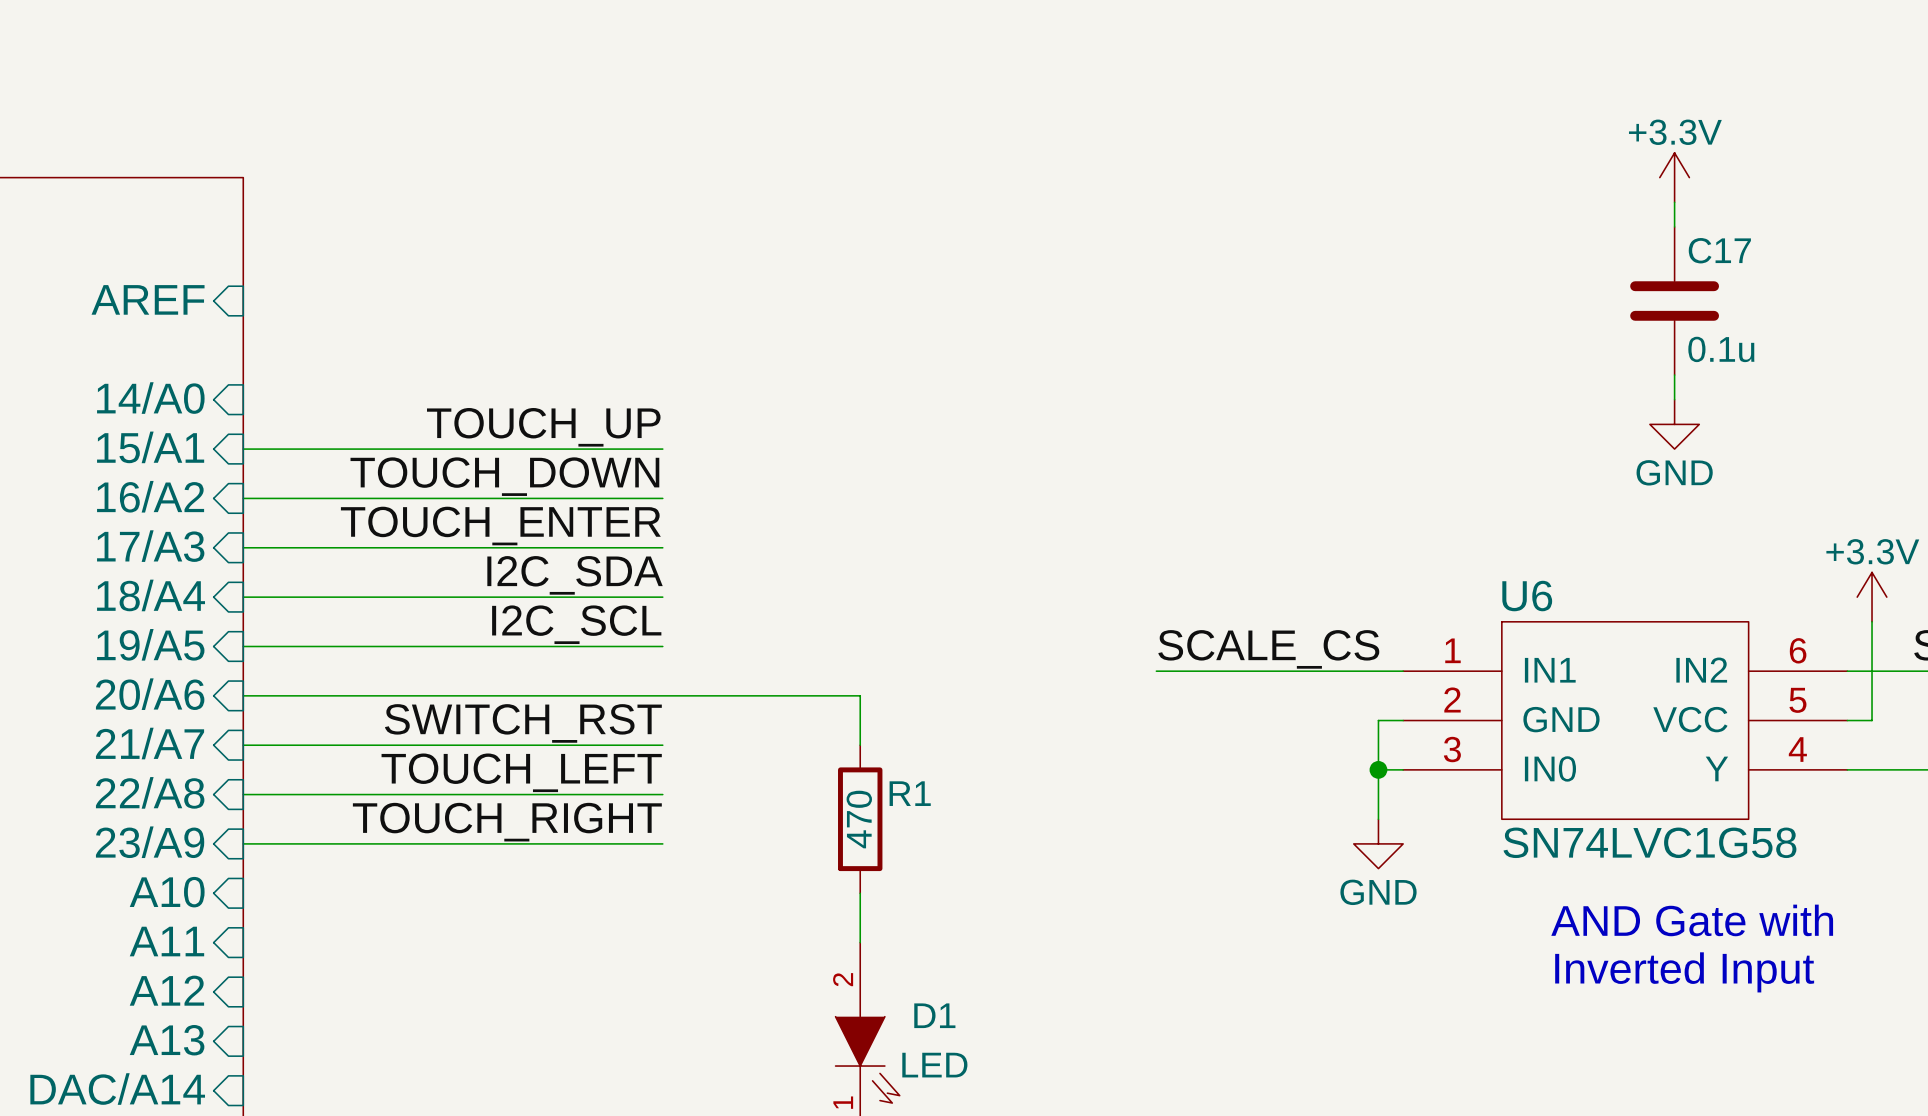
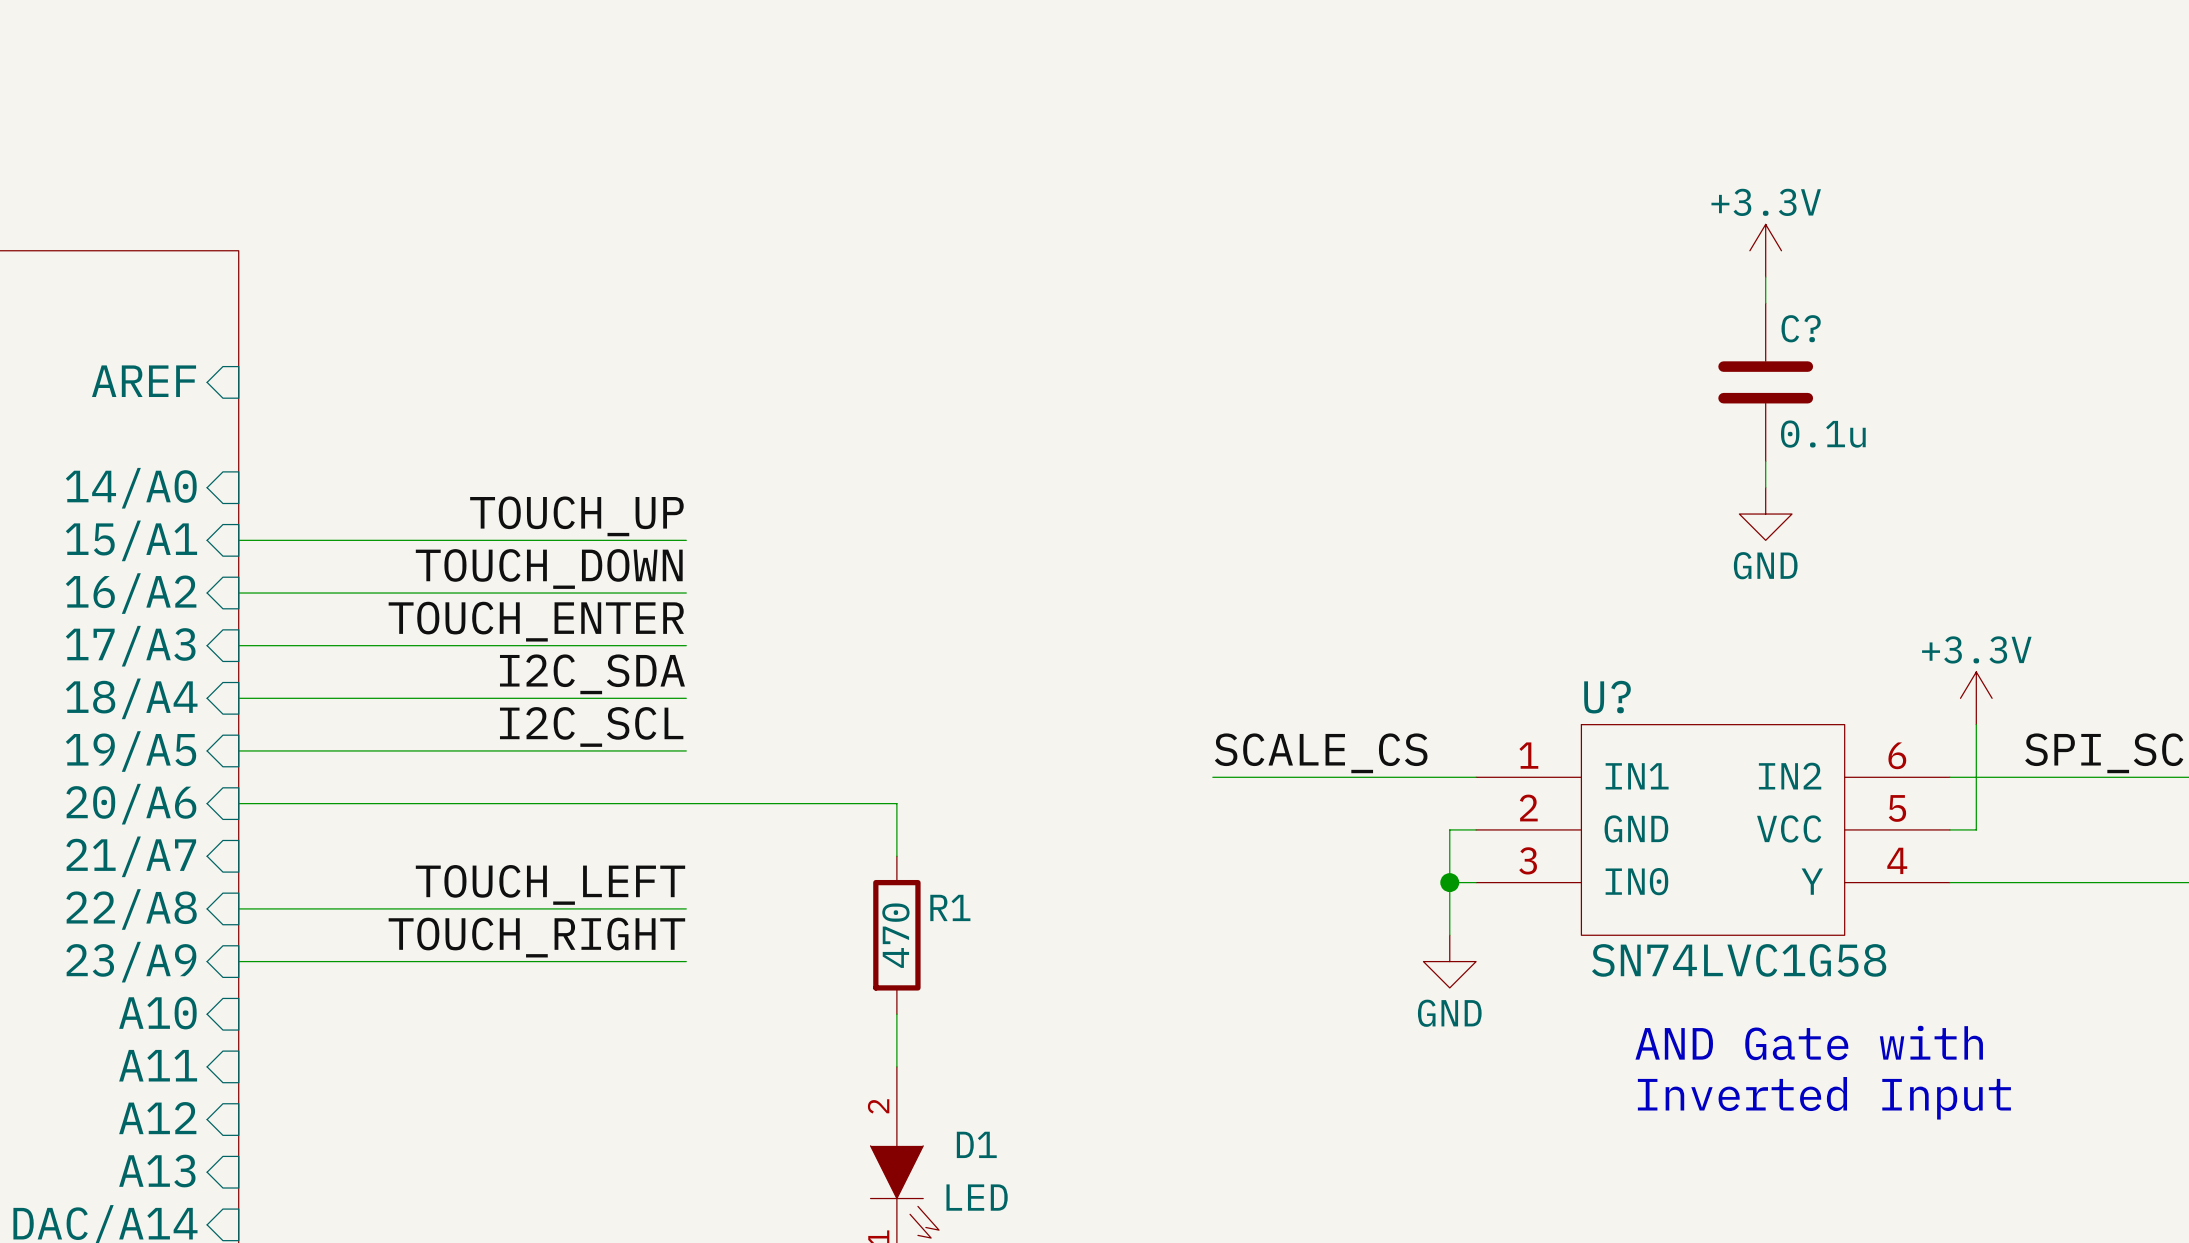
C17 name: C17 (1719, 250) -> C? (1801, 328)
U6 name: U6 (1527, 596) -> U? (1607, 697)
label: SWITCH_RST (523, 723) -> none
wire: (243, 745) (662, 745) -> none

